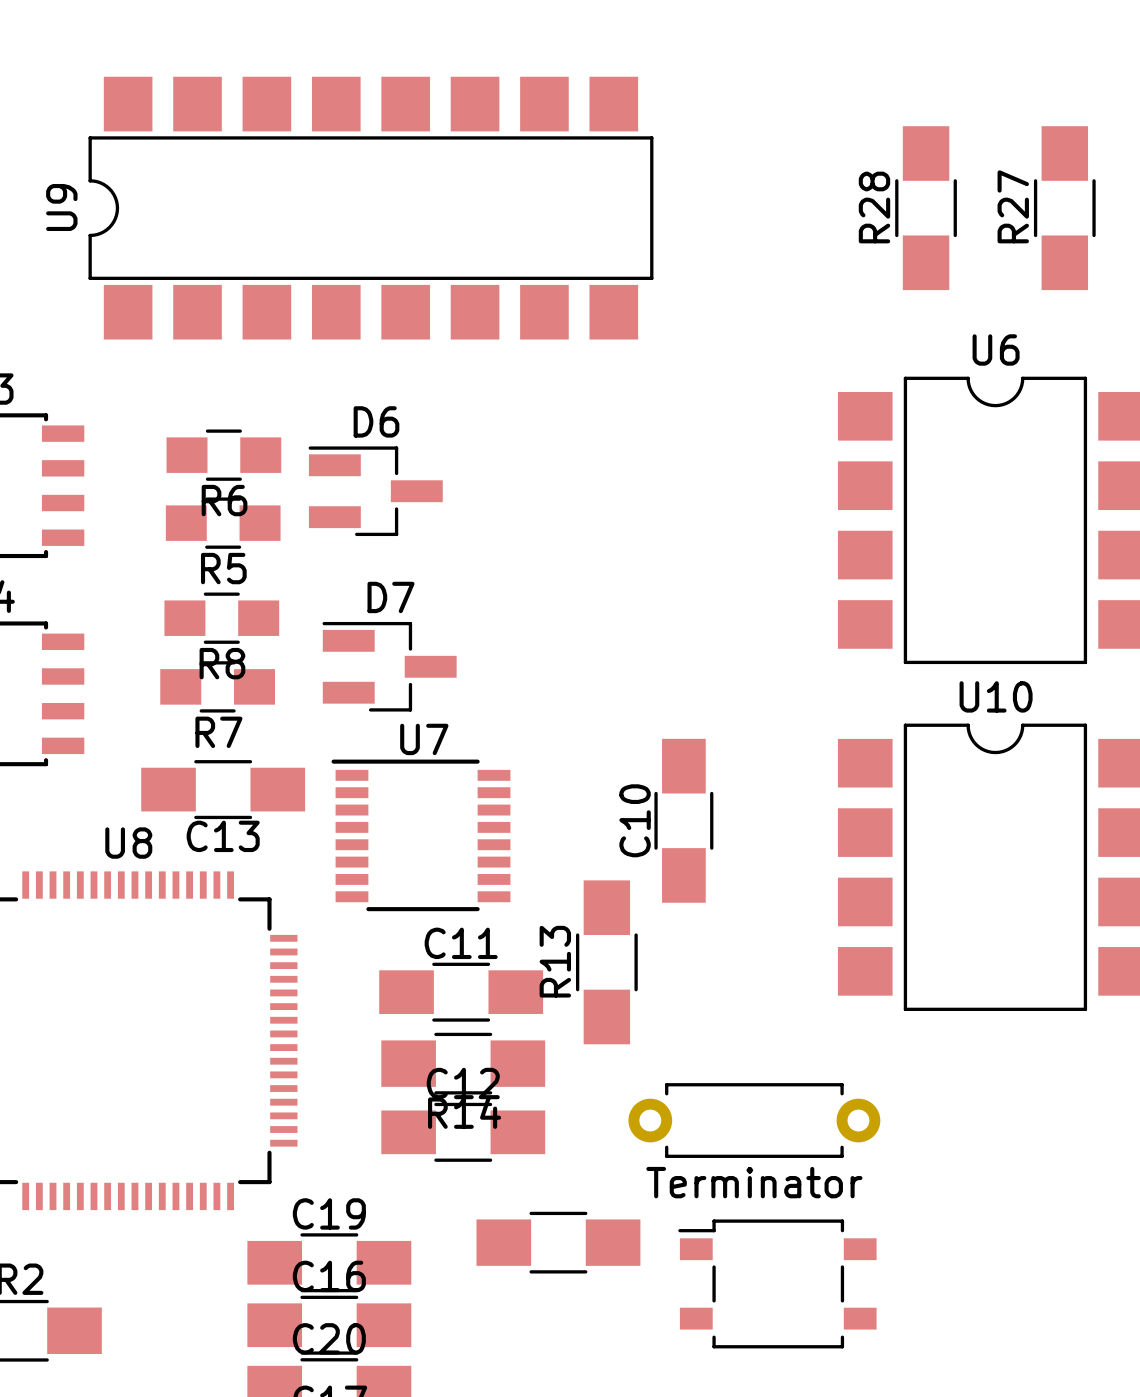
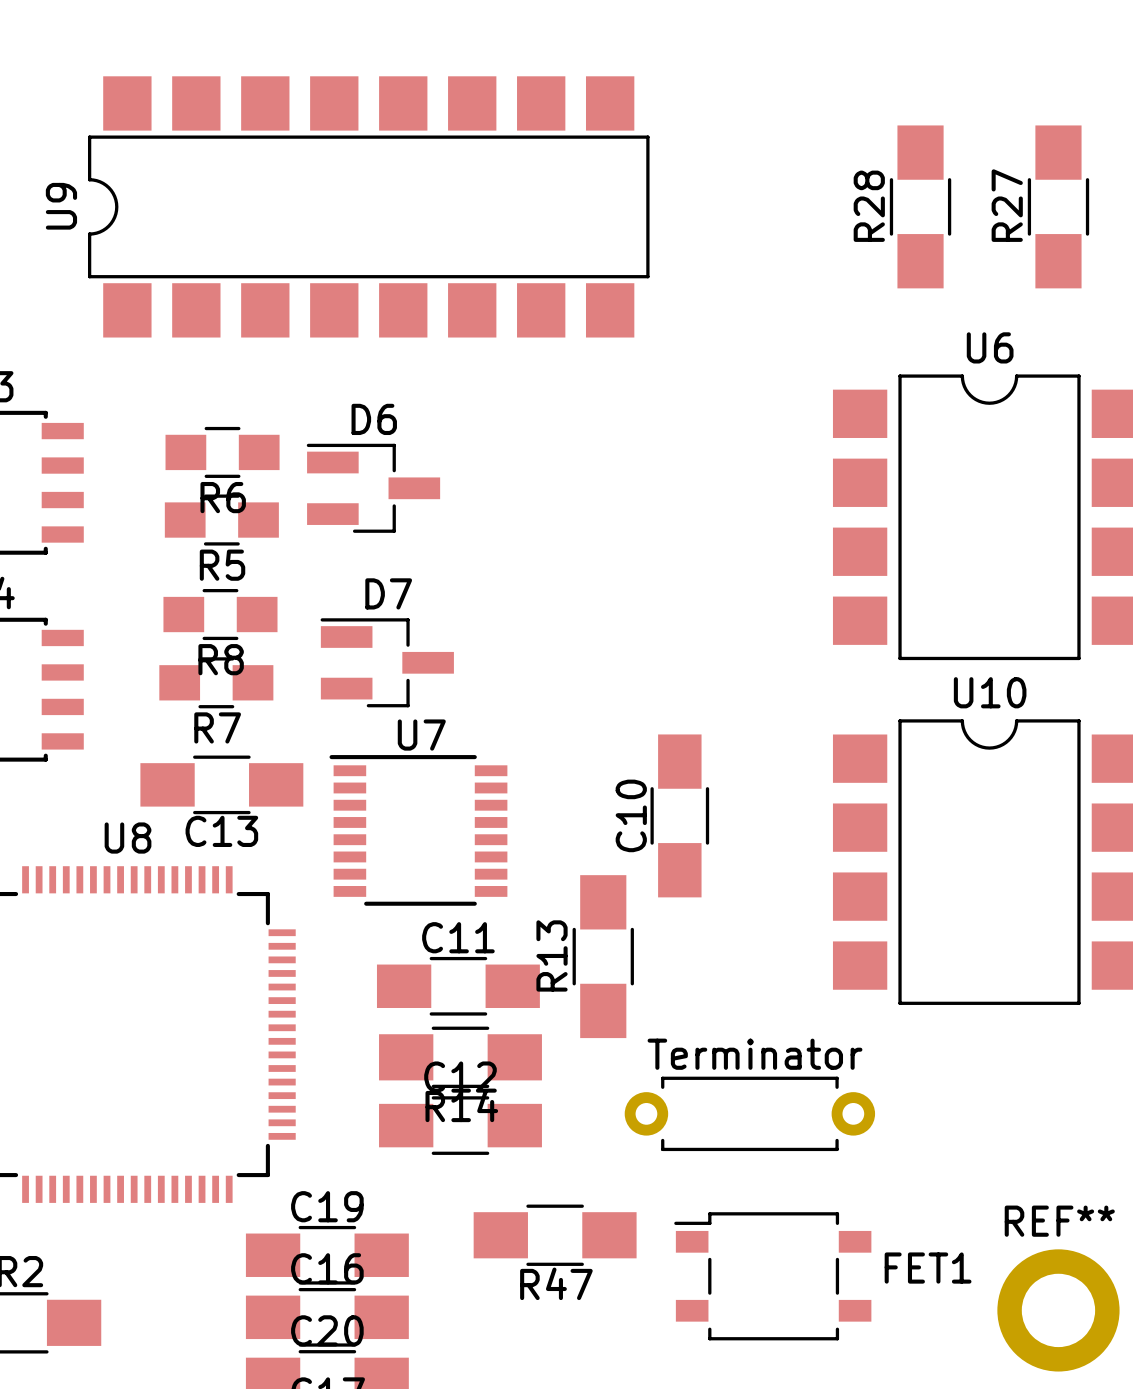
Terminator name position: Terminator (754, 1182) -> Terminator (755, 1054)
FET1 name: none -> FET1 (928, 1268)
R47 name: none -> R47 (556, 1283)
REF**: none -> (1058, 1310)

